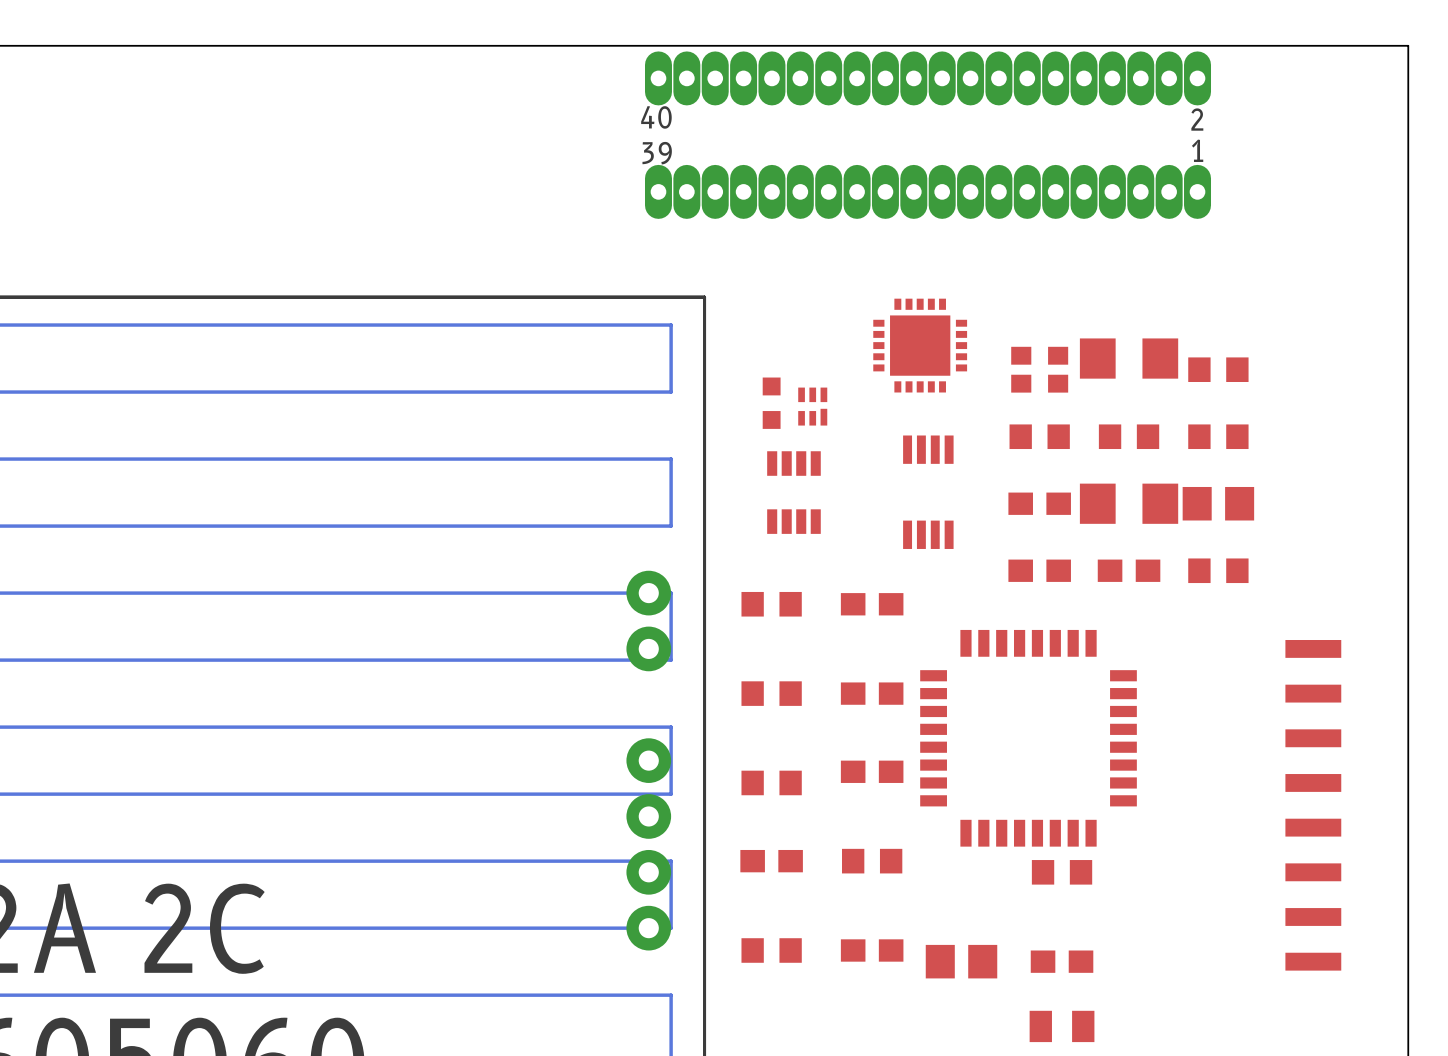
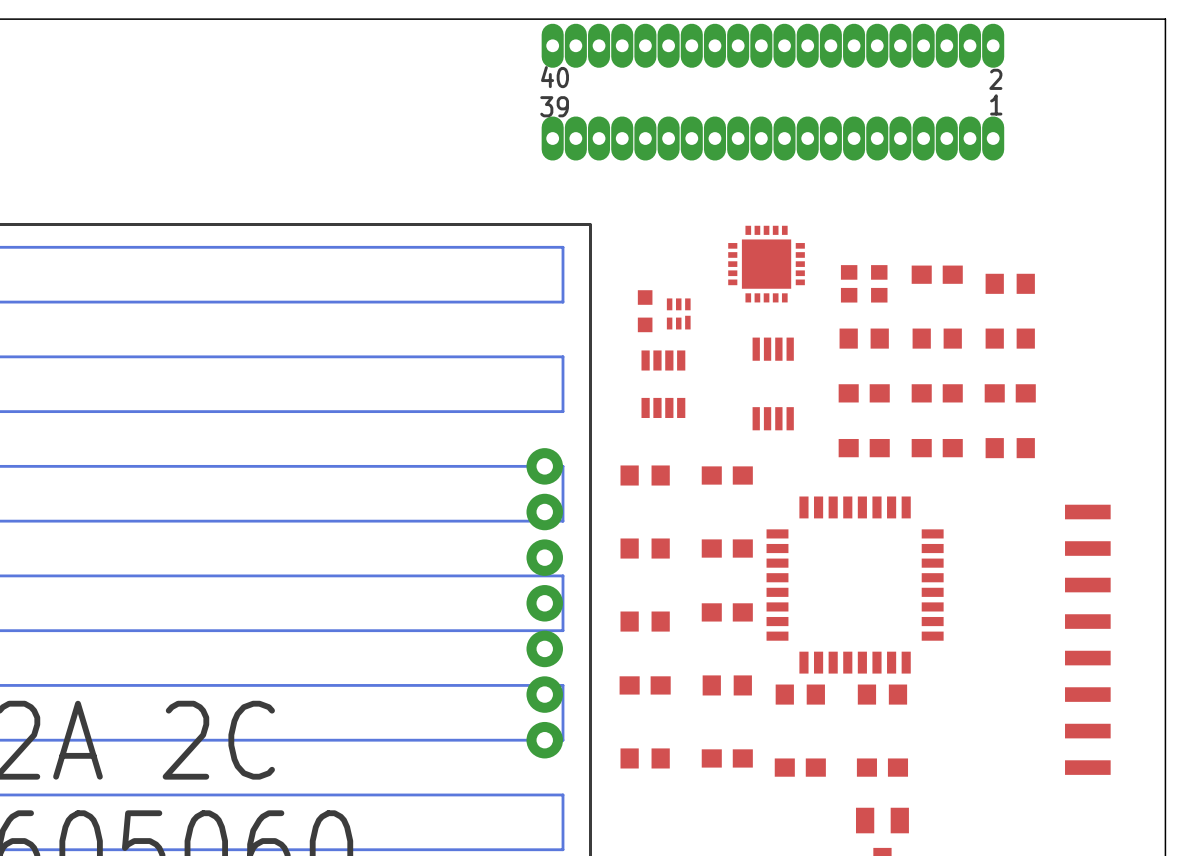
part footprint: [1079, 338, 1179, 379] -> [911, 265, 963, 284]
part footprint: [1079, 483, 1179, 524] -> [911, 384, 963, 403]
part footprint: [1182, 486, 1255, 521] -> [984, 384, 1036, 403]
part: none -> (544, 557)
part: none -> (800, 694)
part footprint: [925, 944, 998, 979] -> [774, 758, 826, 777]

